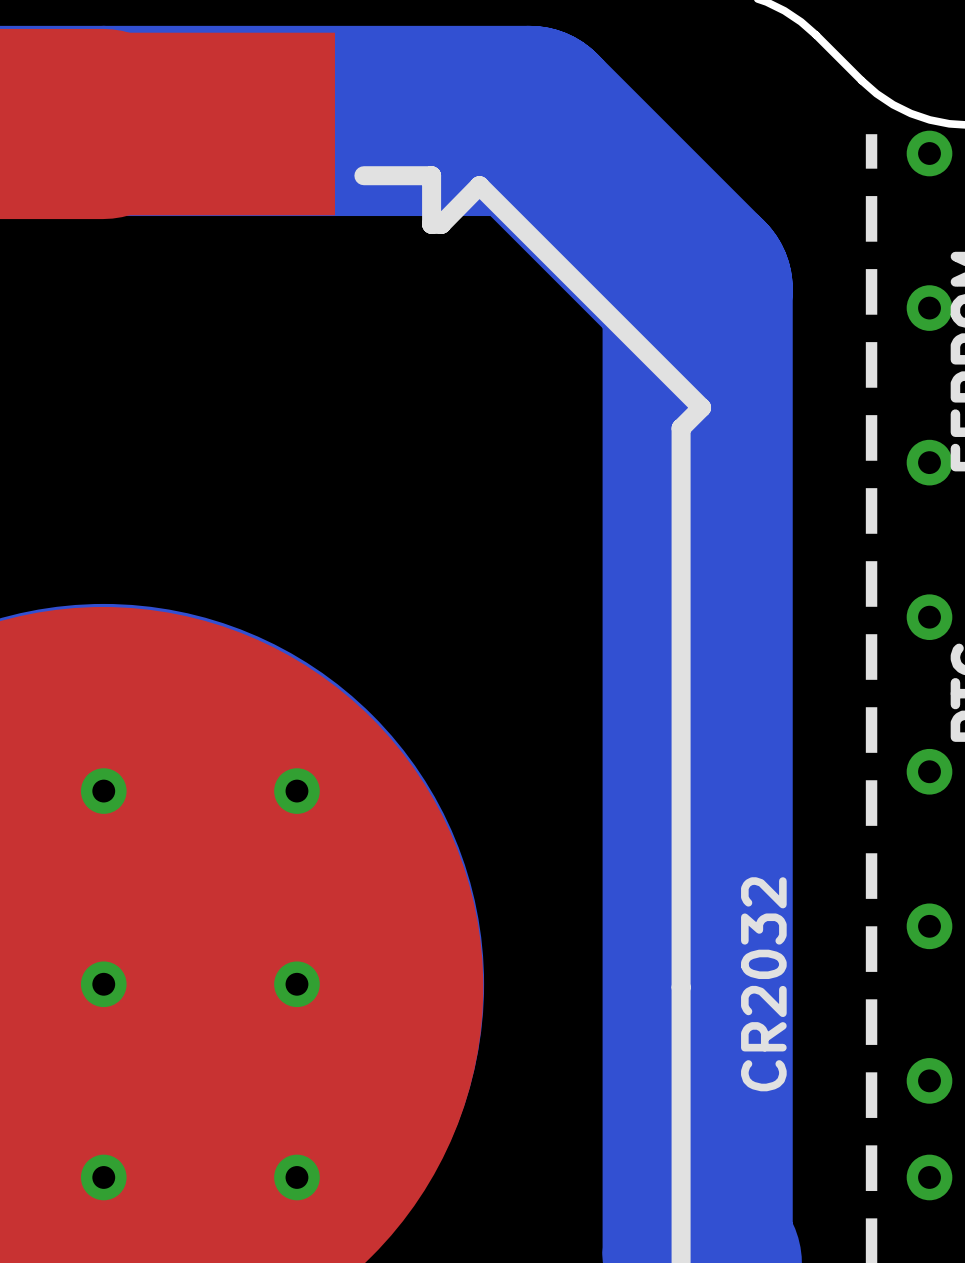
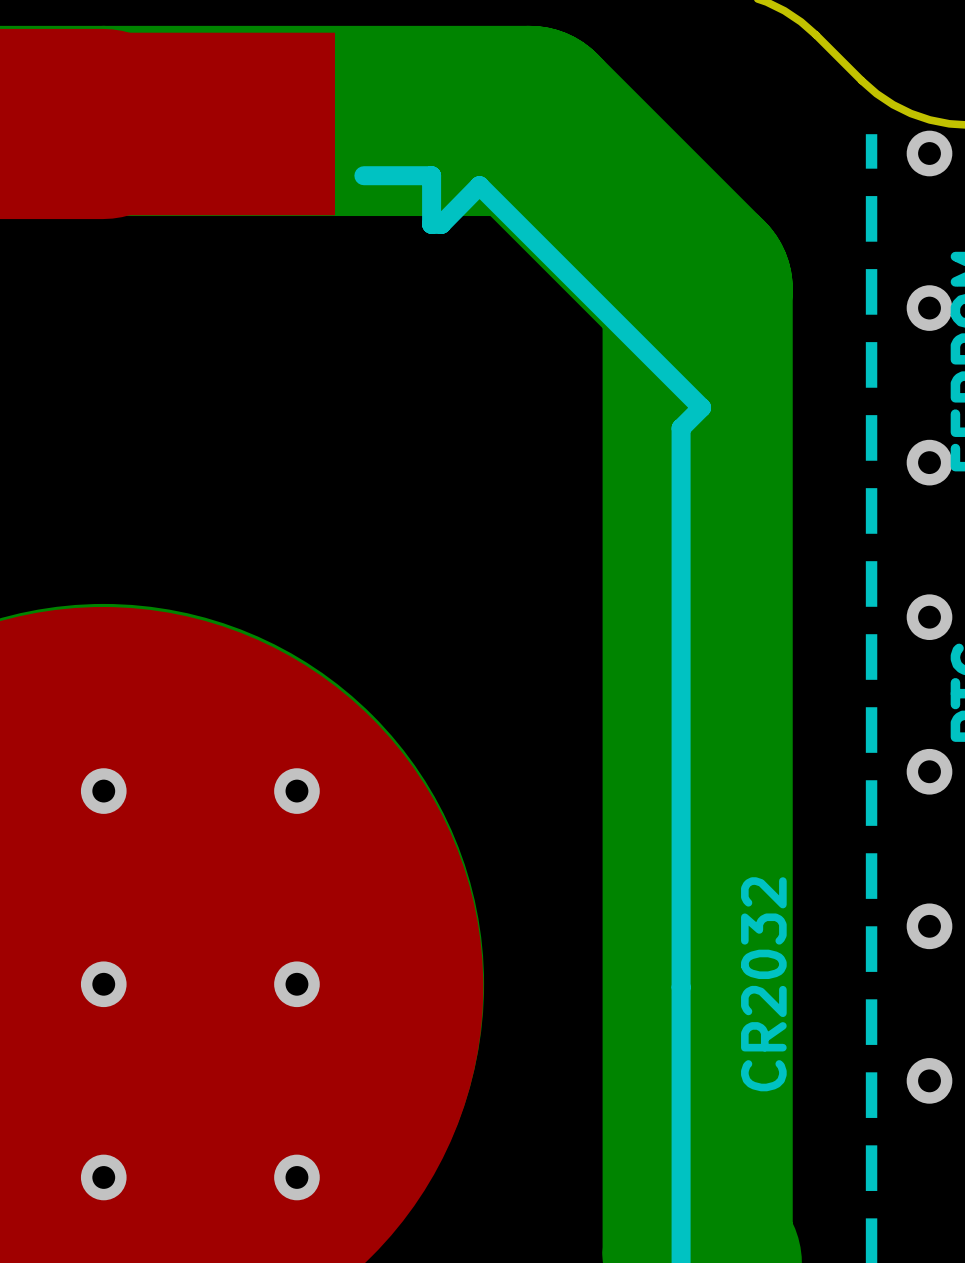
via: (929, 1177) -> none

